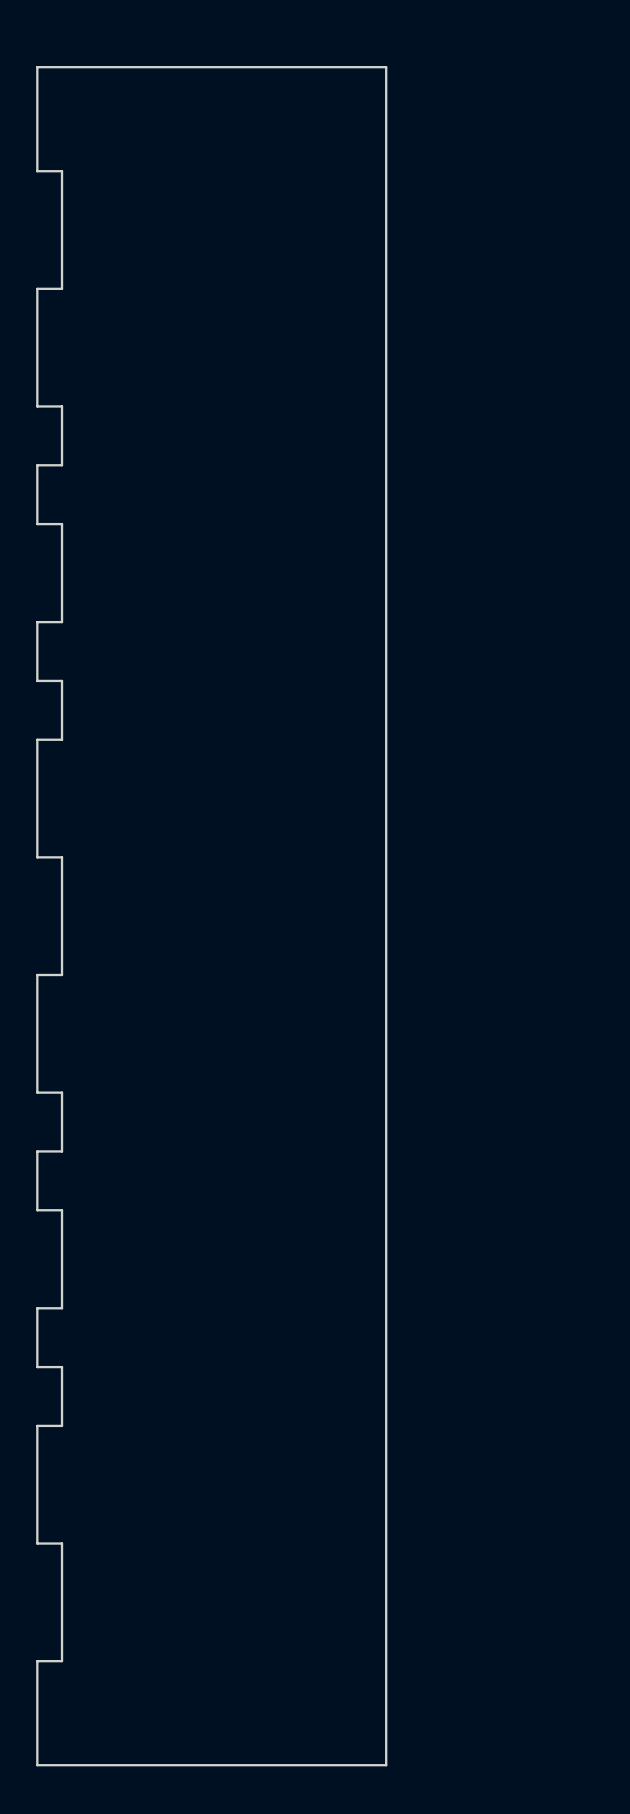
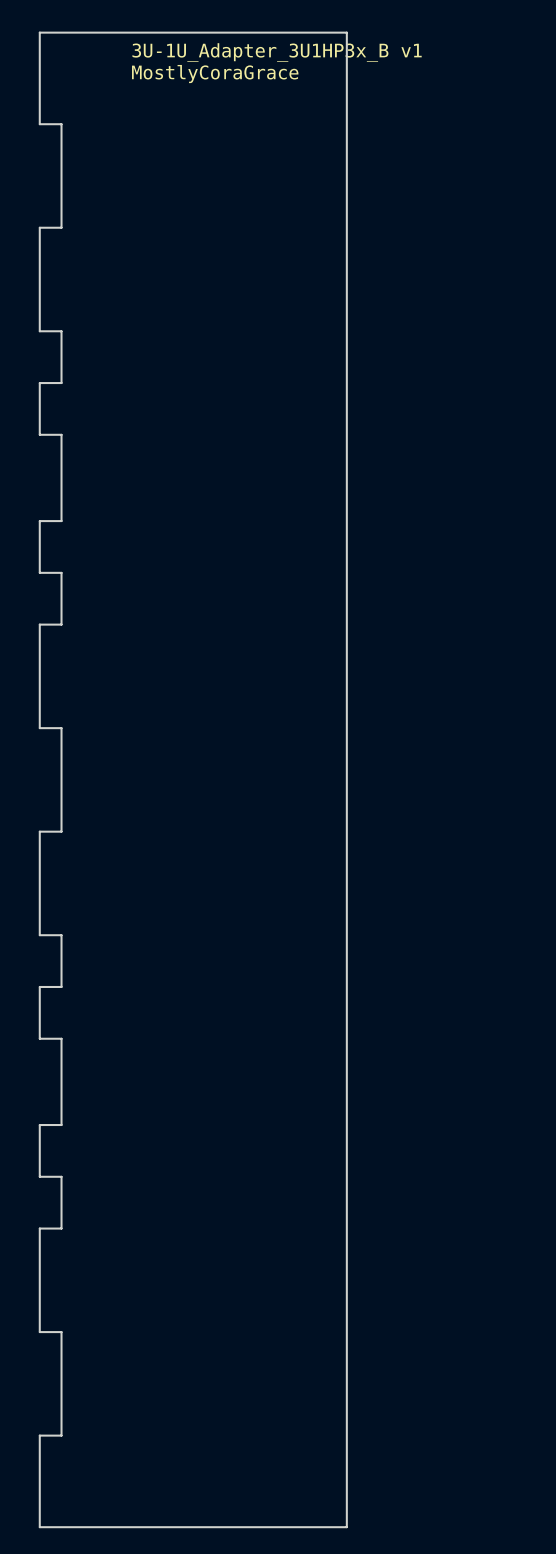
text: none -> 3U-1U_Adapter_3U1HP3x_B v1 (277, 52)
text: none -> MostlyCoraGrace (215, 74)

